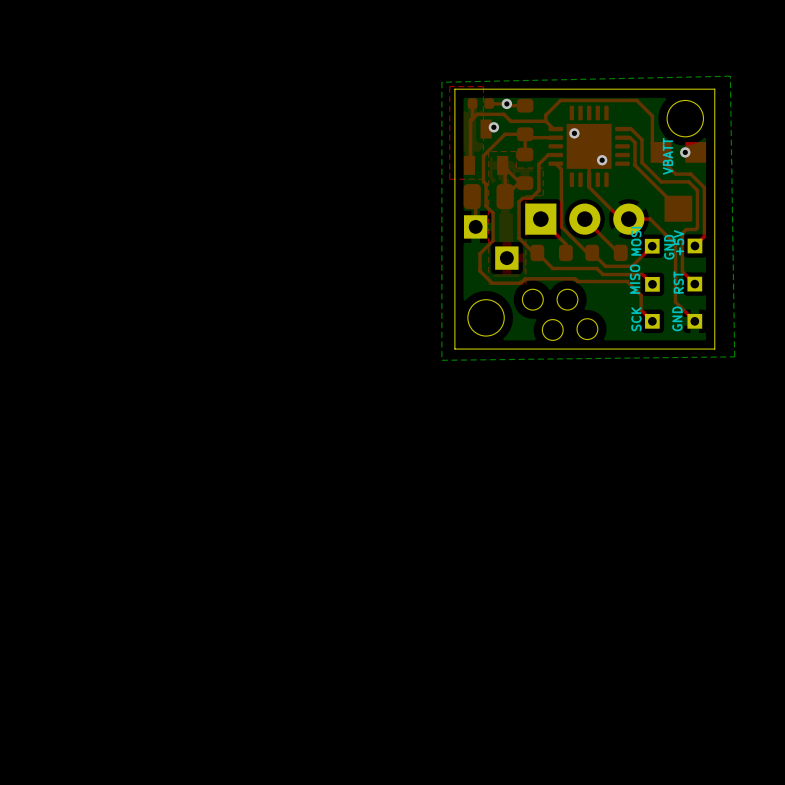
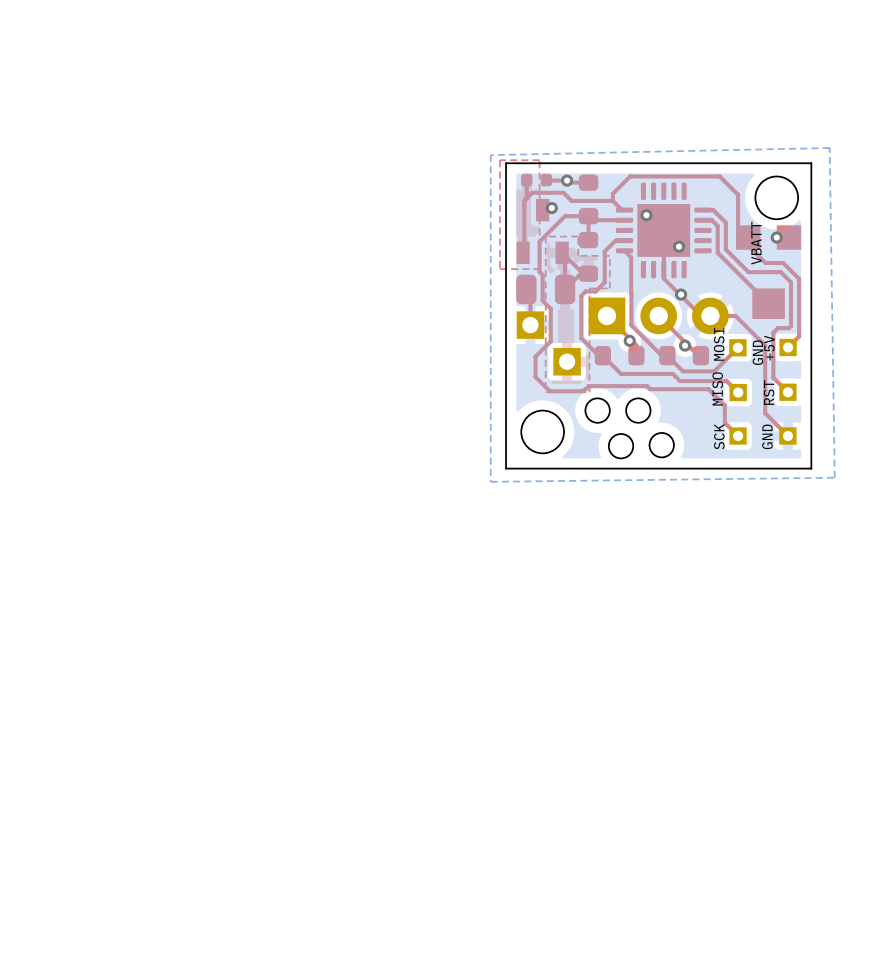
via: none -> (681, 294)
via: none -> (629, 340)
via: none -> (685, 345)

